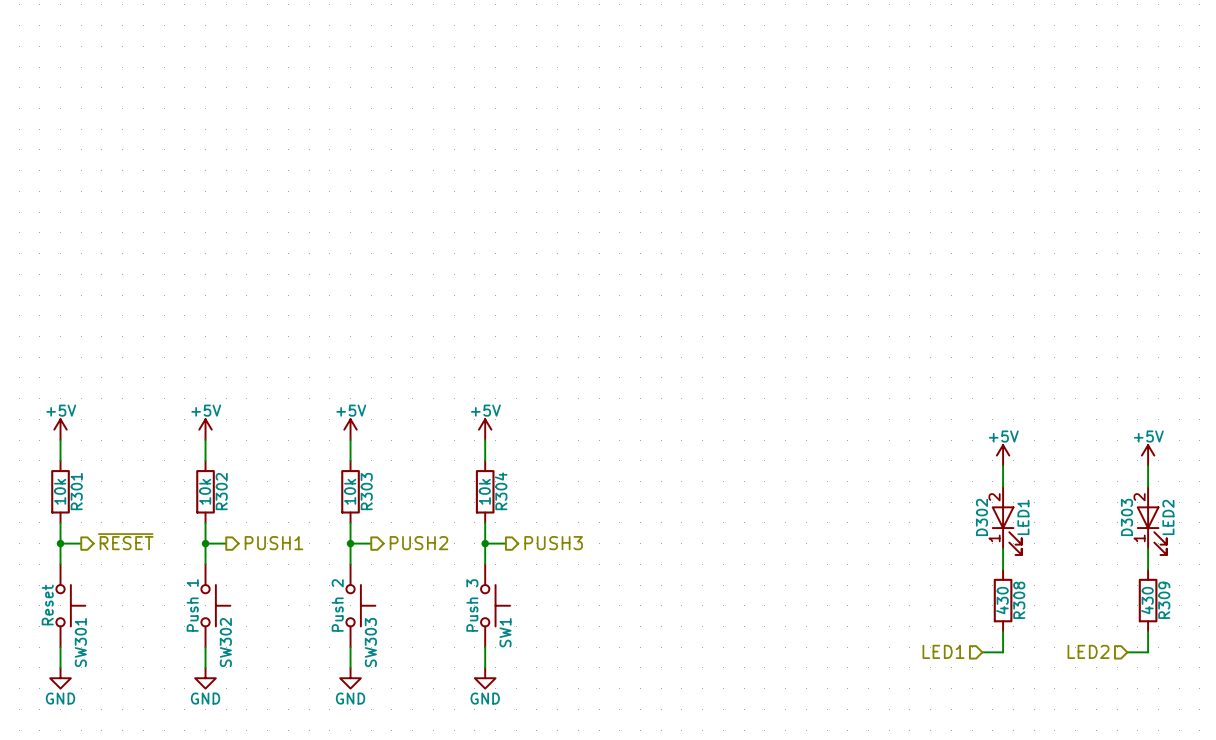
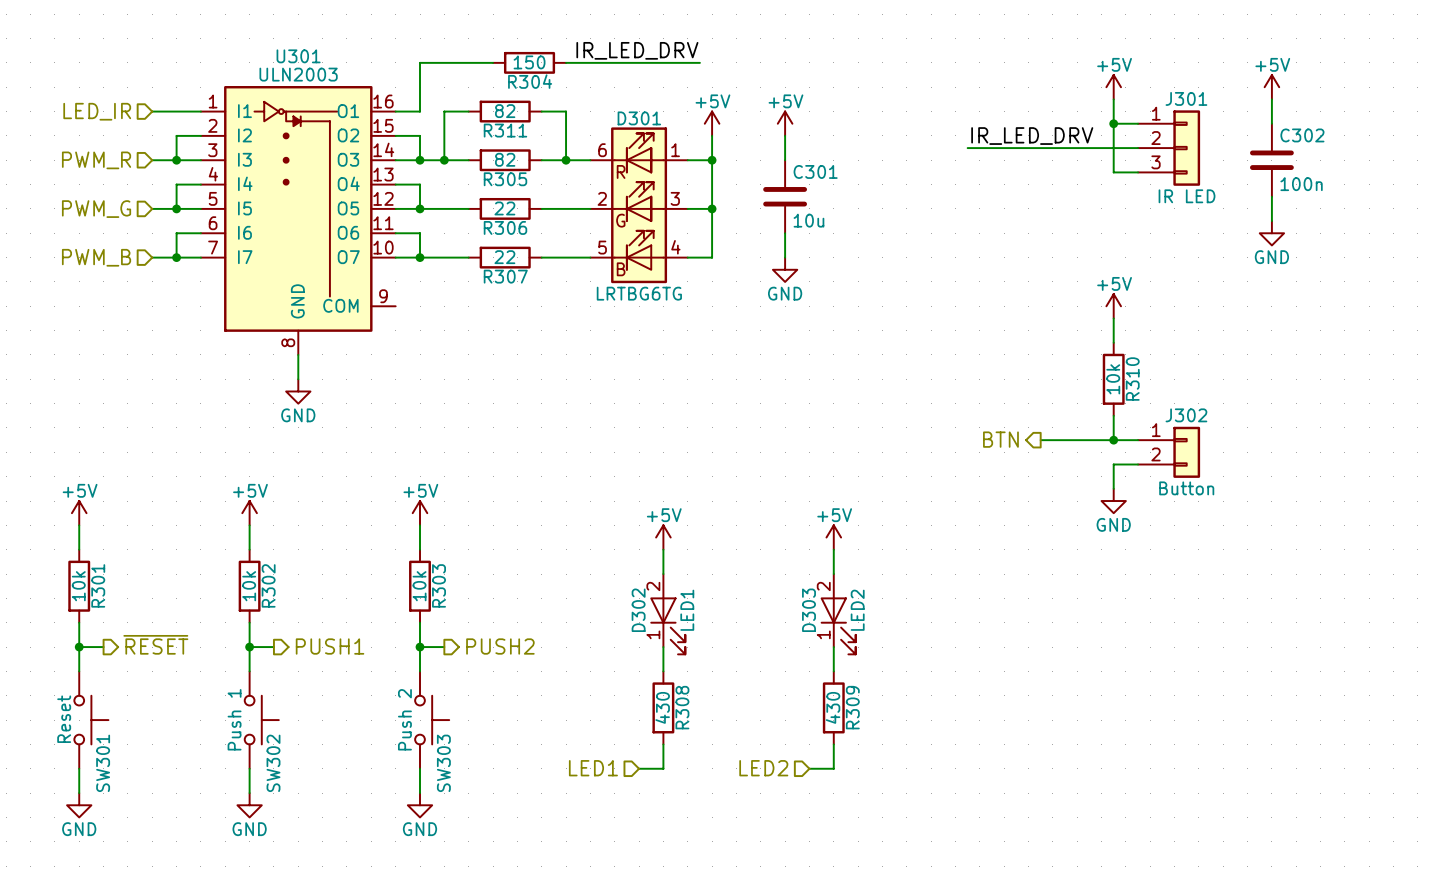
label: none -> IR_LED_DRV (637, 50)
wire: none -> (493, 62) (420, 62) (420, 111) (395, 111)
wire: none -> (566, 62) (699, 62)
power symbol: none -> +5V (1113, 87)
power symbol: none -> +5V (1271, 87)
wire: none -> (1113, 99) (1113, 172) (1138, 172)
wire: none -> (1271, 99) (1271, 123)
hierarchical label: none -> LED_IR (97, 111)
wire: none -> (152, 111) (200, 111)
wire: none -> (468, 111) (444, 111) (444, 160)
R311: none -> 82 (505, 111)
wire: none -> (541, 111) (566, 111) (566, 160)
power symbol: none -> +5V (712, 123)
power symbol: none -> +5V (785, 123)
wire: none -> (1113, 123) (1138, 123)
junction: none -> (1113, 123)
wire: none -> (200, 135) (176, 135) (176, 160)
wire: none -> (395, 135) (420, 135) (420, 160)
wire: none -> (712, 135) (712, 257) (687, 257)
wire: none -> (785, 135) (785, 160)
label: none -> IR_LED_DRV (1032, 136)
wire: none -> (967, 148) (1138, 148)
J301: none -> IR LED (1169, 148)
hierarchical label: none -> PWM_R (96, 160)
wire: none -> (152, 160) (200, 160)
junction: none -> (176, 160)
wire: none -> (395, 160) (468, 160)
junction: none -> (420, 160)
junction: none -> (444, 160)
R305: none -> 82 (505, 160)
wire: none -> (541, 160) (590, 160)
junction: none -> (566, 160)
wire: none -> (687, 160) (712, 160)
junction: none -> (712, 160)
C302: none -> 100n (1271, 160)
wire: none -> (200, 184) (176, 184) (176, 208)
wire: none -> (395, 184) (420, 184) (420, 208)
C301: none -> 10u (785, 196)
wire: none -> (1271, 196) (1271, 221)
D301: none -> LRTBG6TG (639, 205)
hierarchical label: none -> PWM_G (96, 209)
wire: none -> (152, 208) (200, 208)
junction: none -> (176, 208)
wire: none -> (395, 208) (468, 208)
junction: none -> (420, 208)
R306: none -> 22 (505, 208)
wire: none -> (541, 208) (590, 208)
wire: none -> (687, 208) (712, 208)
junction: none -> (712, 208)
U301: none -> ULN2003 (298, 220)
wire: none -> (200, 233) (176, 233) (176, 257)
wire: none -> (395, 233) (420, 233) (420, 257)
wire: none -> (785, 233) (785, 257)
power symbol: none -> GND (1271, 233)
hierarchical label: none -> PWM_B (96, 257)
wire: none -> (152, 257) (200, 257)
junction: none -> (176, 257)
wire: none -> (395, 257) (468, 257)
junction: none -> (420, 257)
R307: none -> 22 (505, 257)
wire: none -> (541, 257) (590, 257)
power symbol: none -> GND (785, 269)
power symbol: none -> +5V (1113, 306)
wire: none -> (1113, 318) (1113, 342)
wire: none -> (298, 354) (298, 379)
R310: none -> 10k (1113, 379)
power symbol: none -> GND (298, 391)
hierarchical label: none -> BTN (1000, 439)
wire: none -> (1040, 440) (1138, 440)
junction: none -> (1113, 440)
J302: none -> Button (1169, 452)
wire: none -> (1138, 464) (1113, 464) (1113, 488)
power symbol: none -> GND (1113, 501)
power symbol position: +5V (485, 429) -> +5V (663, 537)
wire: (485, 440) (485, 460) -> (663, 549) (663, 574)
power symbol: none -> +5V (833, 537)
power symbol: +5V (1003, 455) -> none
power symbol: +5V (1148, 455) -> none
wire: none -> (833, 549) (833, 574)
wire: (1003, 465) (1003, 486) -> (1113, 415) (1113, 440)
wire: (1148, 465) (1148, 486) -> none
R304 value: 10k (484, 491) -> 150 (529, 62)
R304 rotation: 0° (485, 491) -> 90° clockwise (529, 62)
R304 position: (485, 491) -> (529, 62)
D302 position: (1006, 520) -> (667, 614)
D303 position: (1151, 520) -> (838, 614)
wire: (485, 522) (485, 564) -> none
wire: (485, 543) (505, 543) -> none
junction: (485, 543) -> none
hierarchical label: PUSH3 (553, 543) -> none
wire: none -> (833, 647) (833, 671)
wire: (1003, 548) (1003, 569) -> none
wire: (1148, 548) (1148, 569) -> none
R308 position: (1003, 600) -> (663, 707)
R309 position: (1148, 600) -> (833, 707)
SW1: Push 3 (495, 605) -> none
wire: none -> (663, 744) (663, 768) (639, 768)
wire: none -> (833, 744) (833, 768) (809, 768)
wire: (1003, 631) (1003, 652) (982, 652) -> none
wire: (1148, 631) (1148, 652) (1127, 652) -> none
hierarchical label: none -> LED1 (593, 768)
hierarchical label: none -> LED2 (763, 768)
wire: (485, 647) (485, 667) -> (663, 647) (663, 671)
hierarchical label: LED1 (943, 651) -> none
hierarchical label: LED2 (1088, 651) -> none
power symbol: GND (485, 678) -> none

